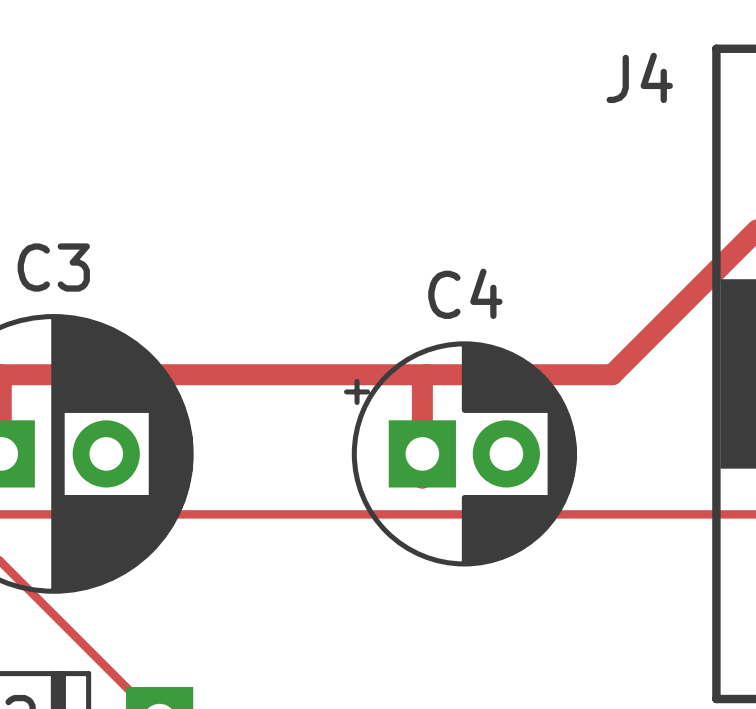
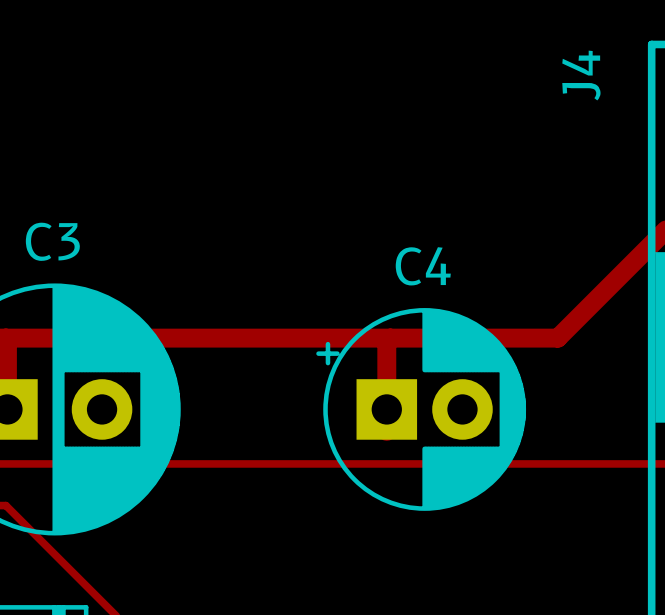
J4 name rotation: 0° (639, 77) -> 90° counterclockwise (581, 75)

